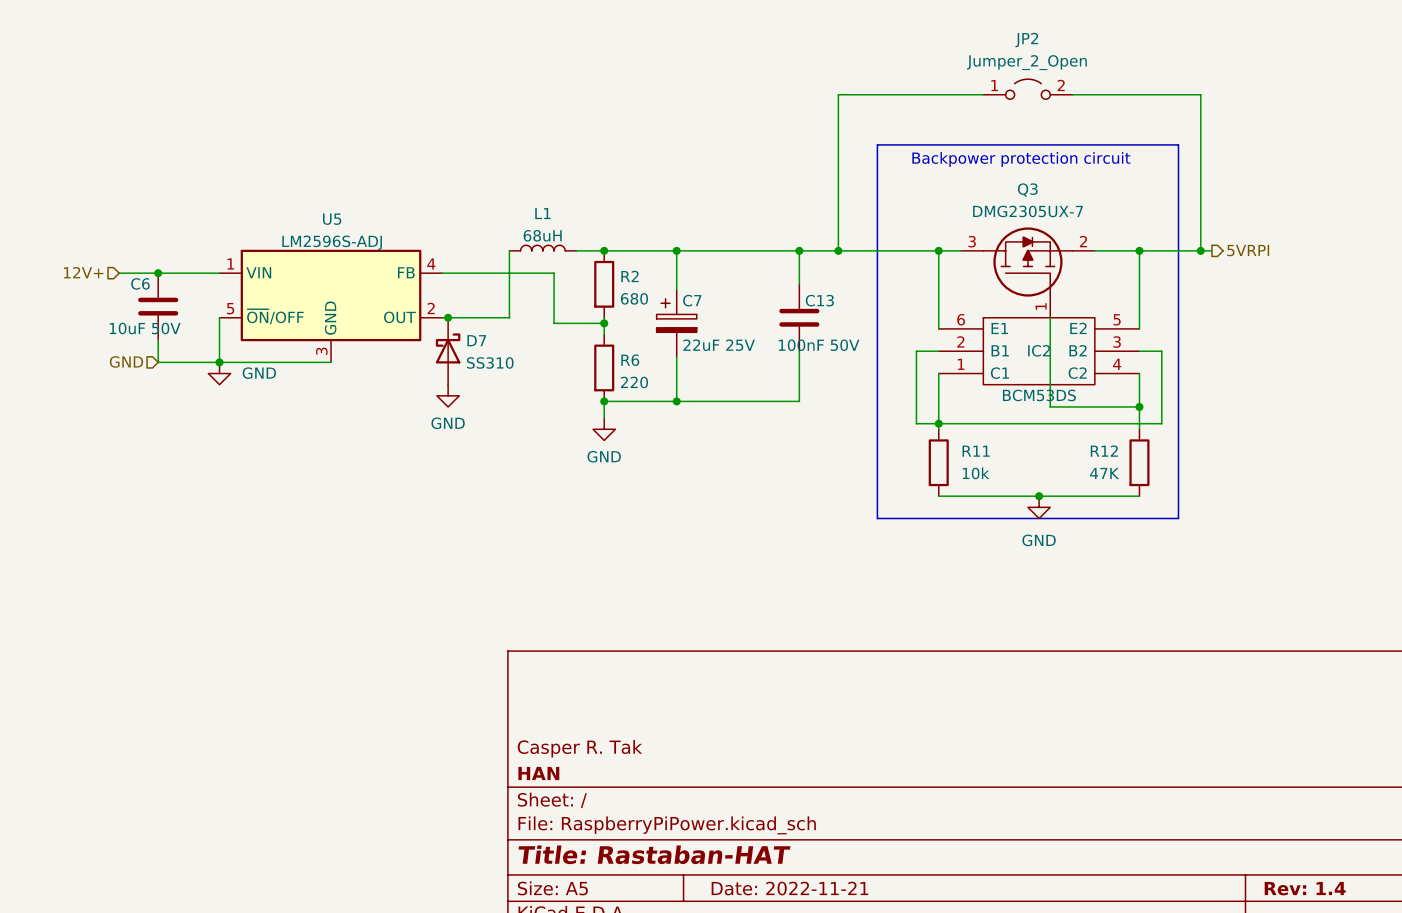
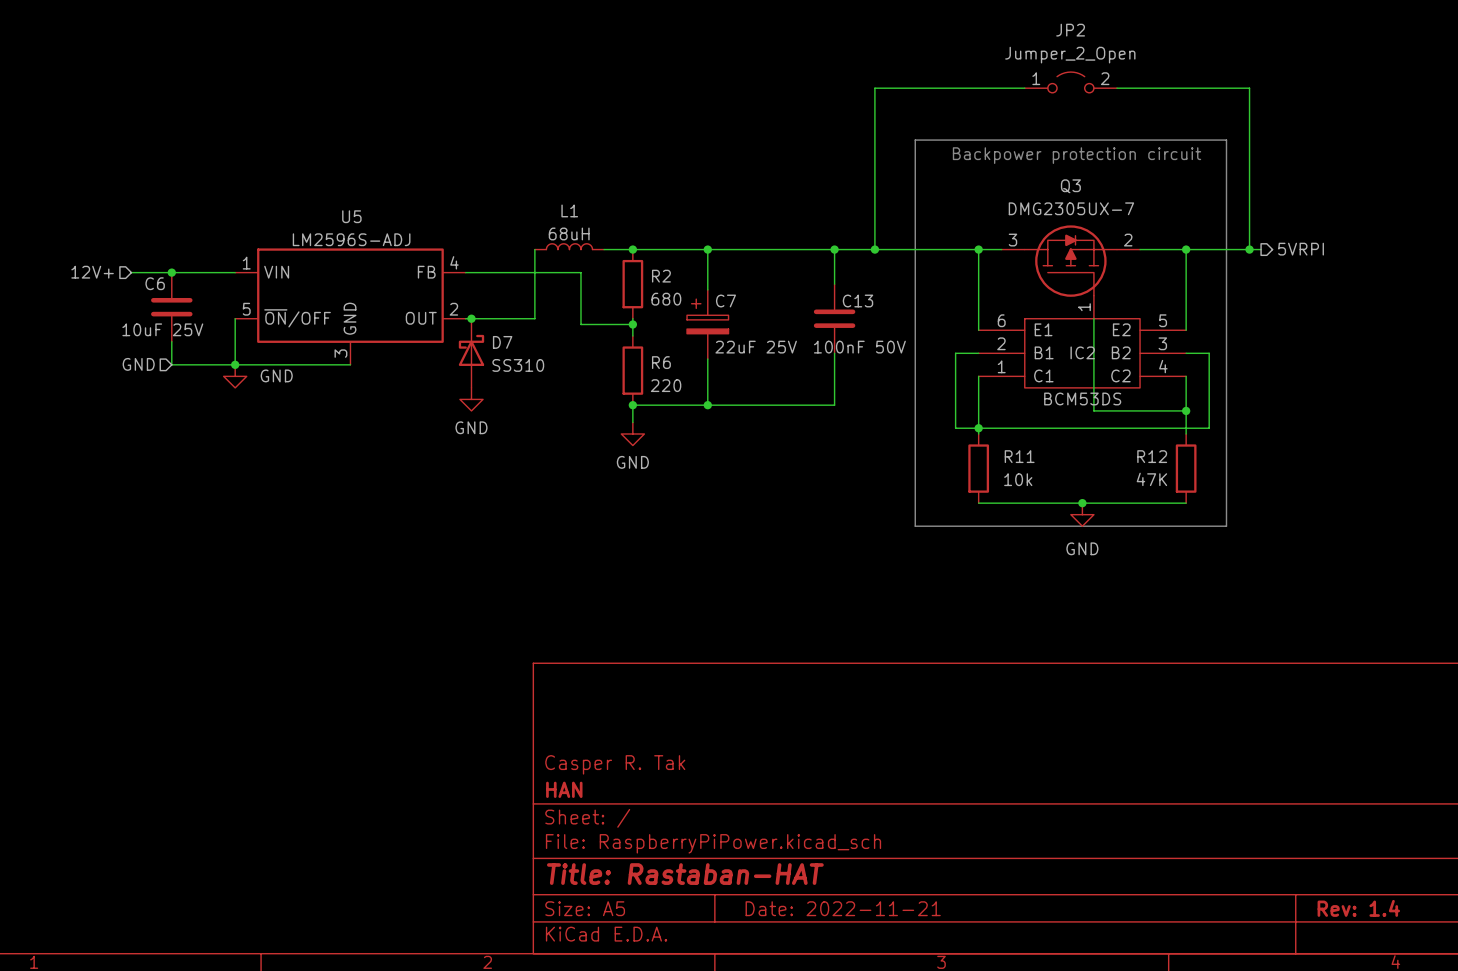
C6 value: 10uF 50V (145, 328) -> 10uF 25V (162, 329)

